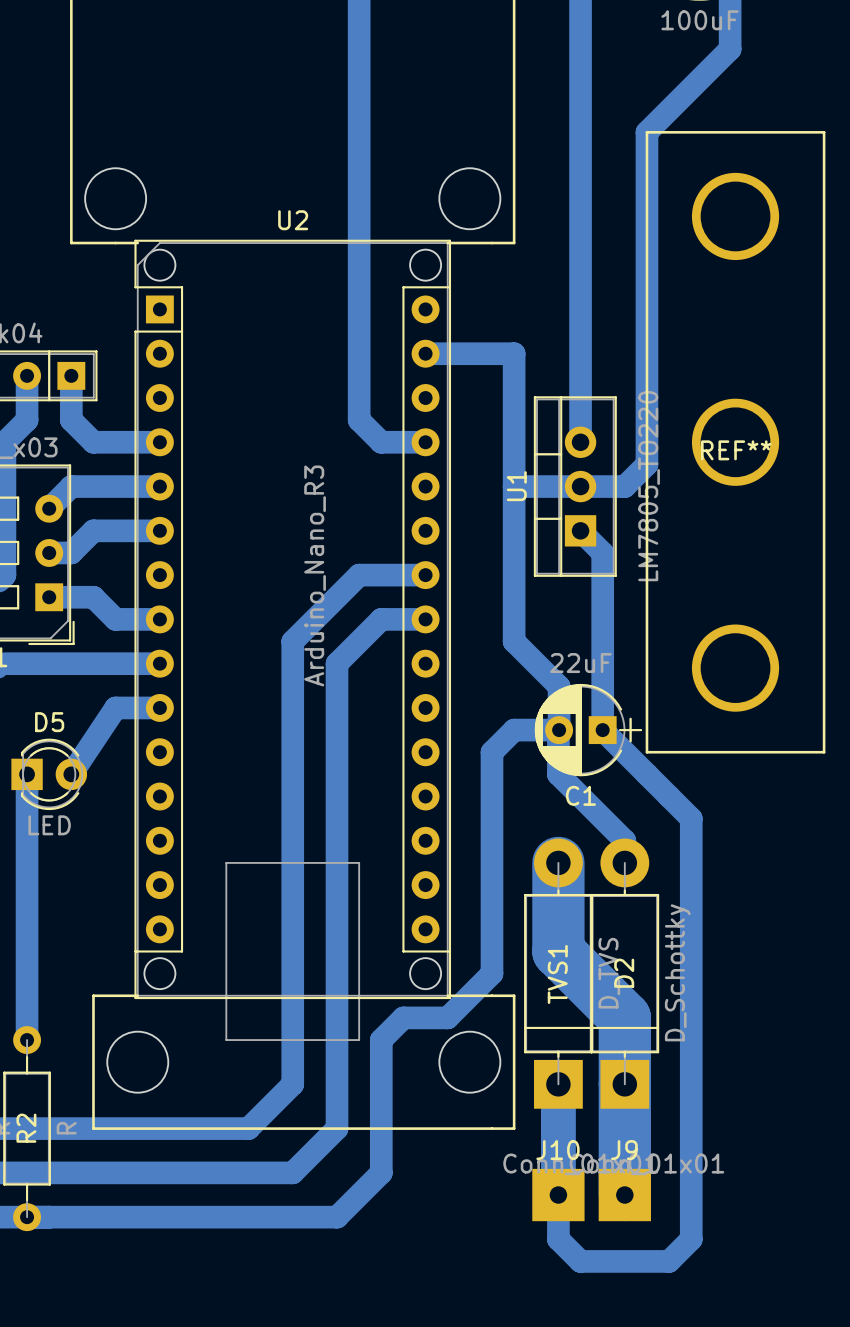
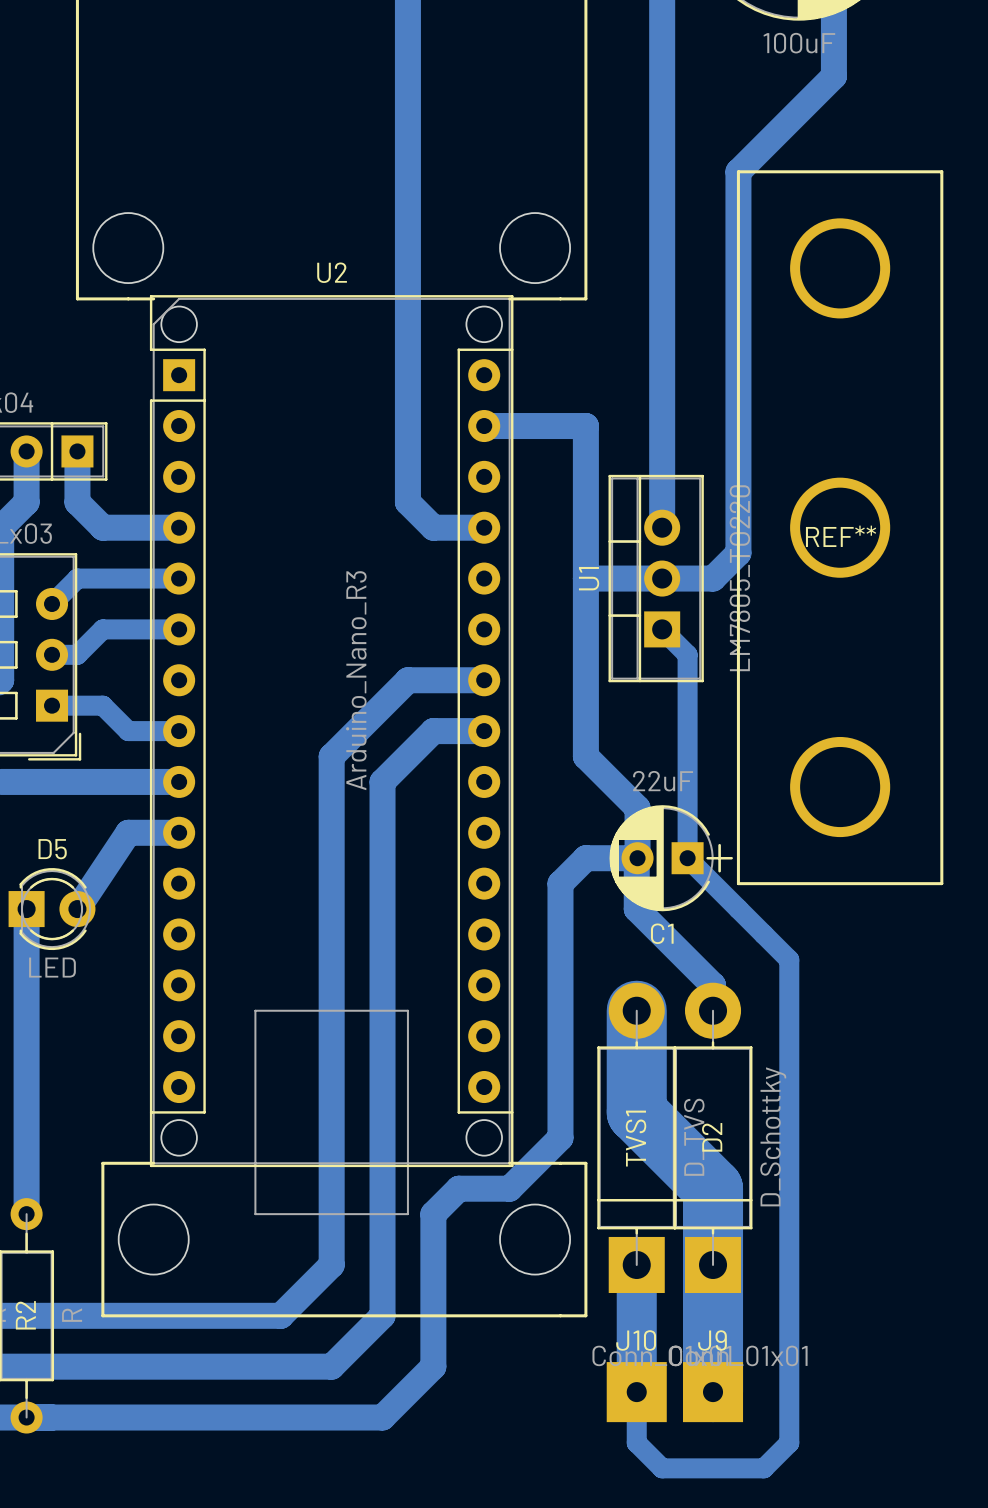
bottom track width: thick (159, 486) (71, 486) (49, 508) -> thin (179, 578) (77, 578) (52, 603)
bottom track width: thick (159, 530) (93, 530) (71, 552) (49, 552) -> thin (179, 629) (102, 629) (77, 654) (52, 654)
bottom track width: thick (580, 530) (602, 552) (602, 730) (691, 818) (691, 1239) (669, 1261) (580, 1261) (558, 1239) (558, 1195) -> thin (662, 629) (687, 654) (687, 858) (789, 959) (789, 1442) (763, 1468) (662, 1468) (636, 1442) (636, 1392)
bottom track width: thick (49, 597) (93, 597) (115, 619) (159, 619) -> thin (52, 705) (102, 705) (128, 731) (179, 731)

